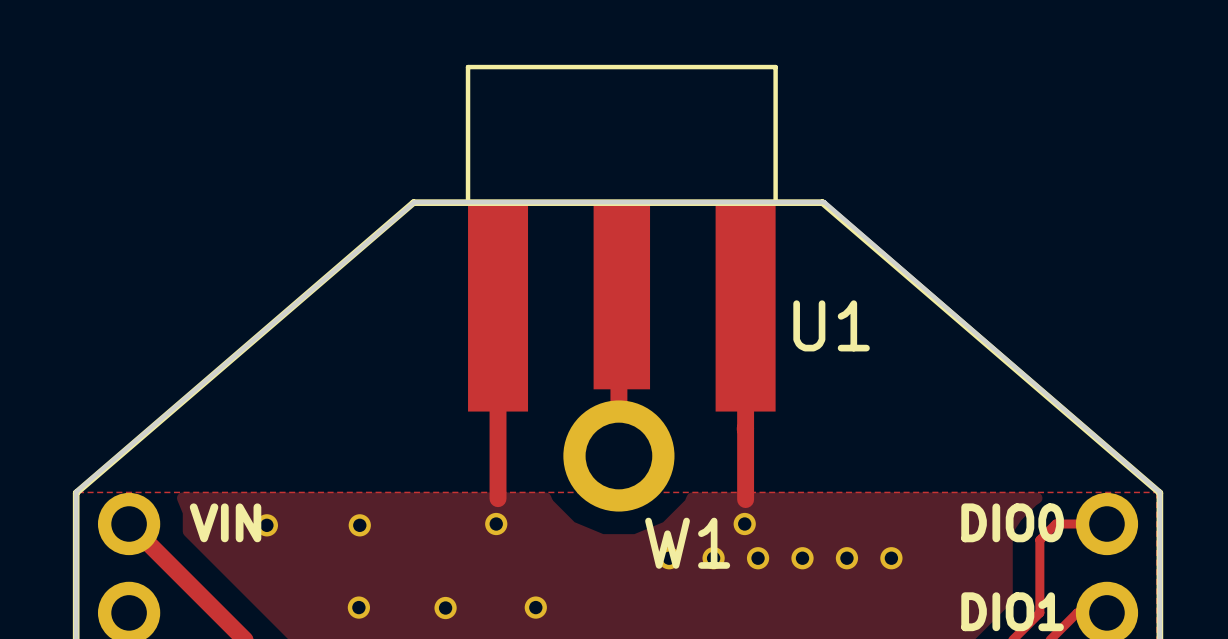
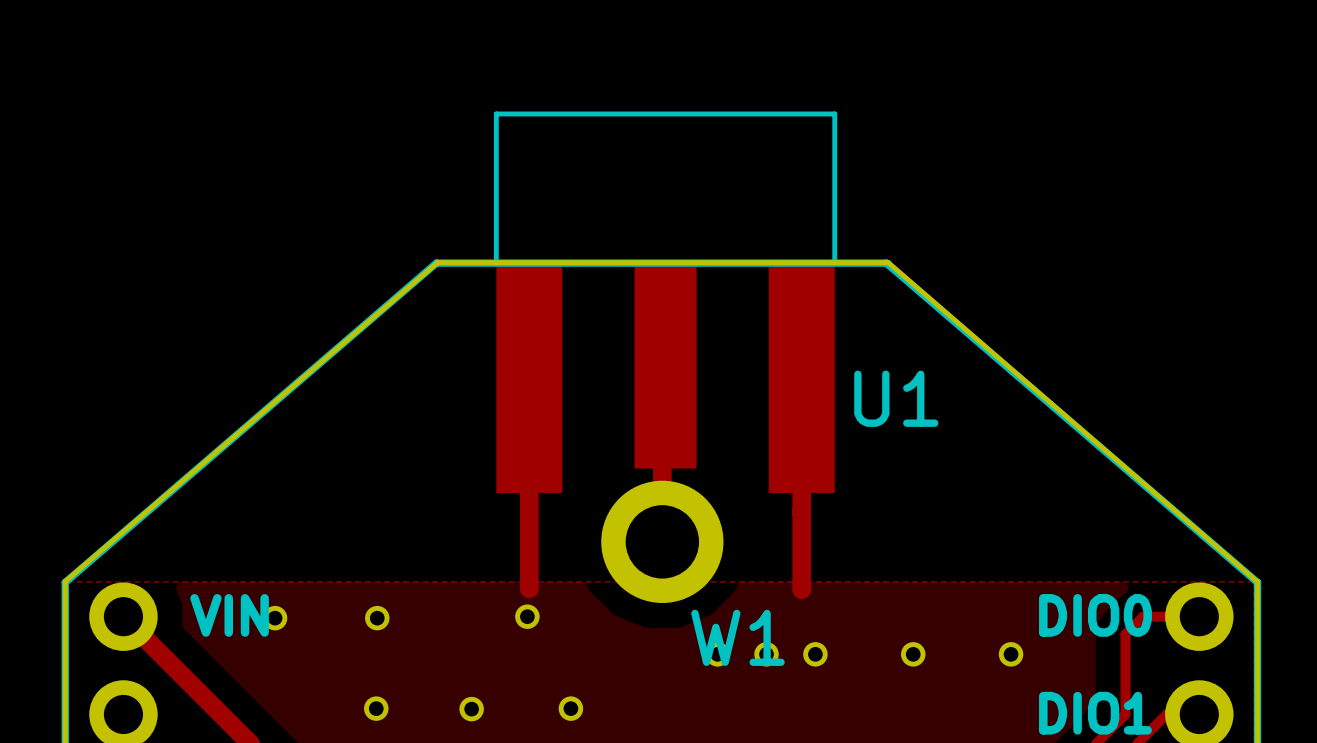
part: (744, 524) -> none
part: (802, 558) -> none
part position: (891, 558) -> (1011, 654)

